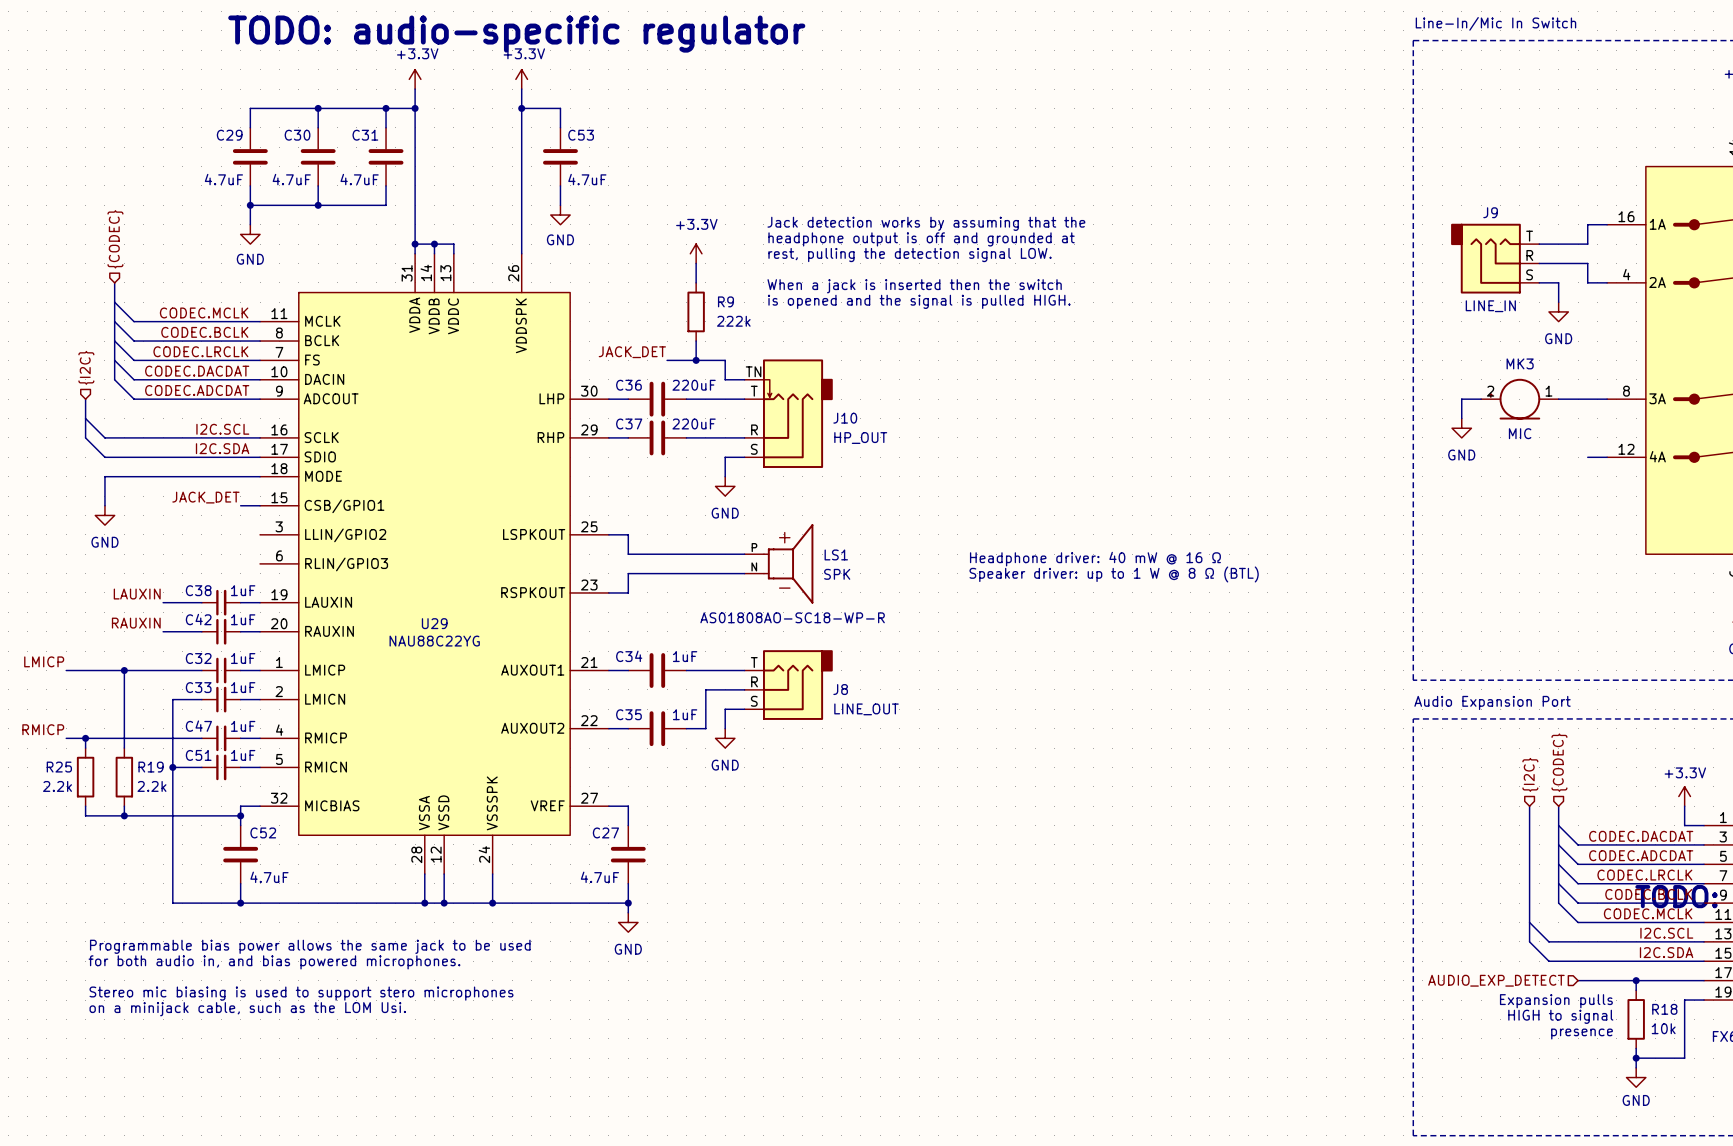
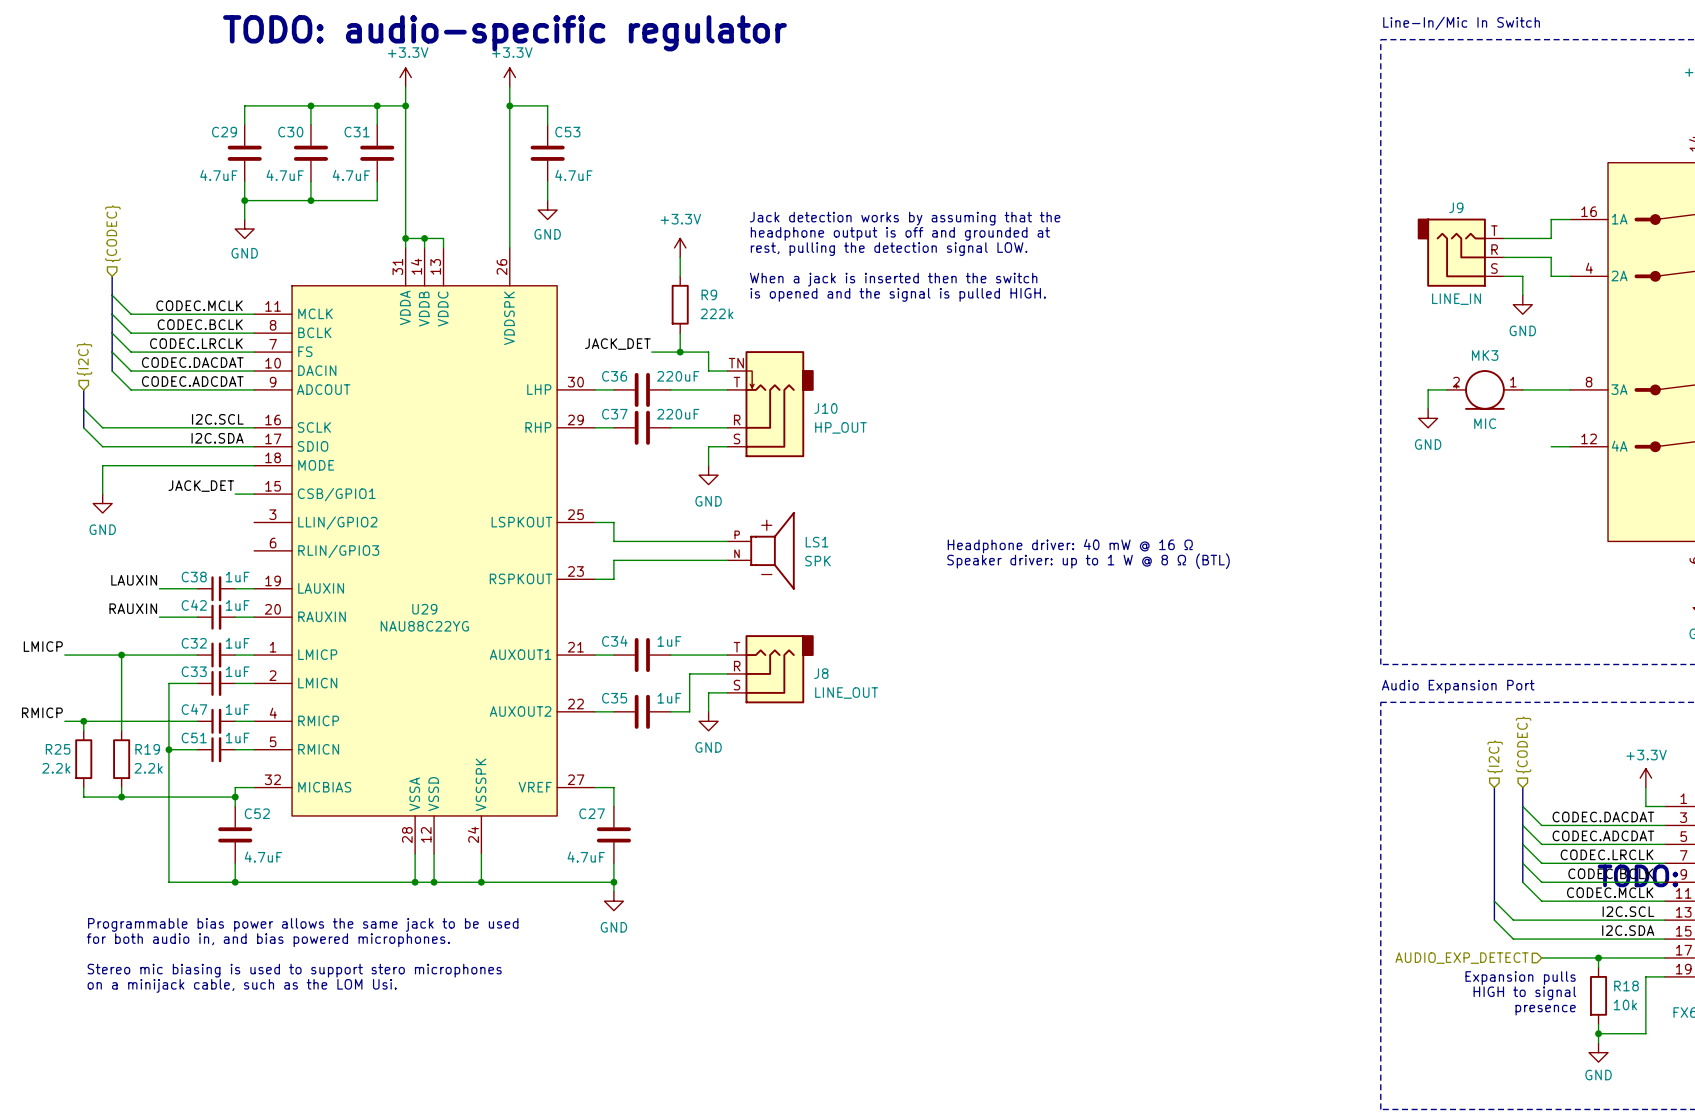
LS1 text: AS01808AO-SC18-WP-R (792, 617) -> none

